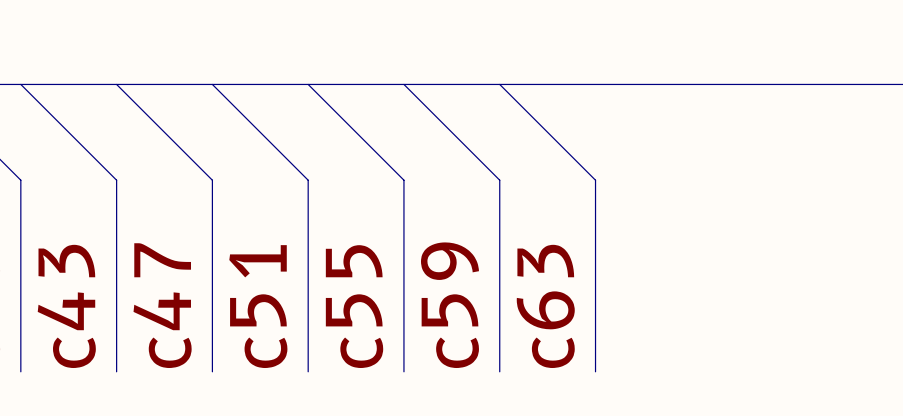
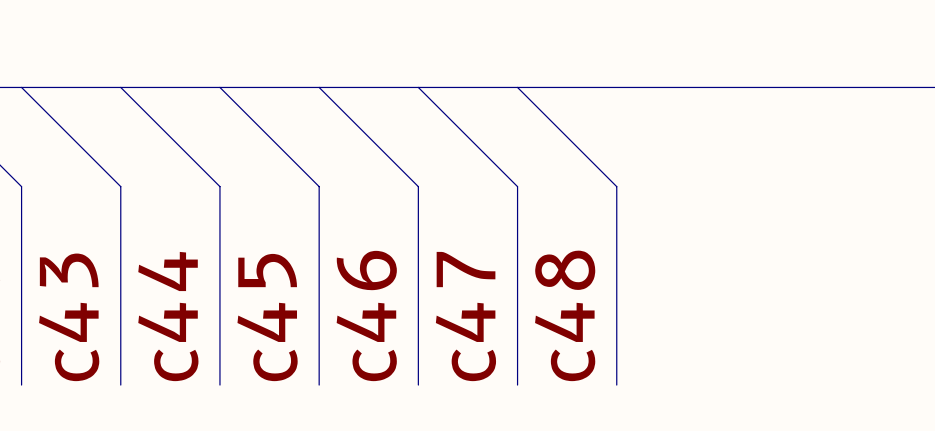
label: c47 (162, 305) -> c44 (168, 316)
label: c59 (449, 305) -> c47 (465, 316)
label: c51 (258, 306) -> c45 (267, 317)
label: c55 (354, 306) -> c46 (366, 315)
label: c63 (545, 306) -> c48 (565, 315)

